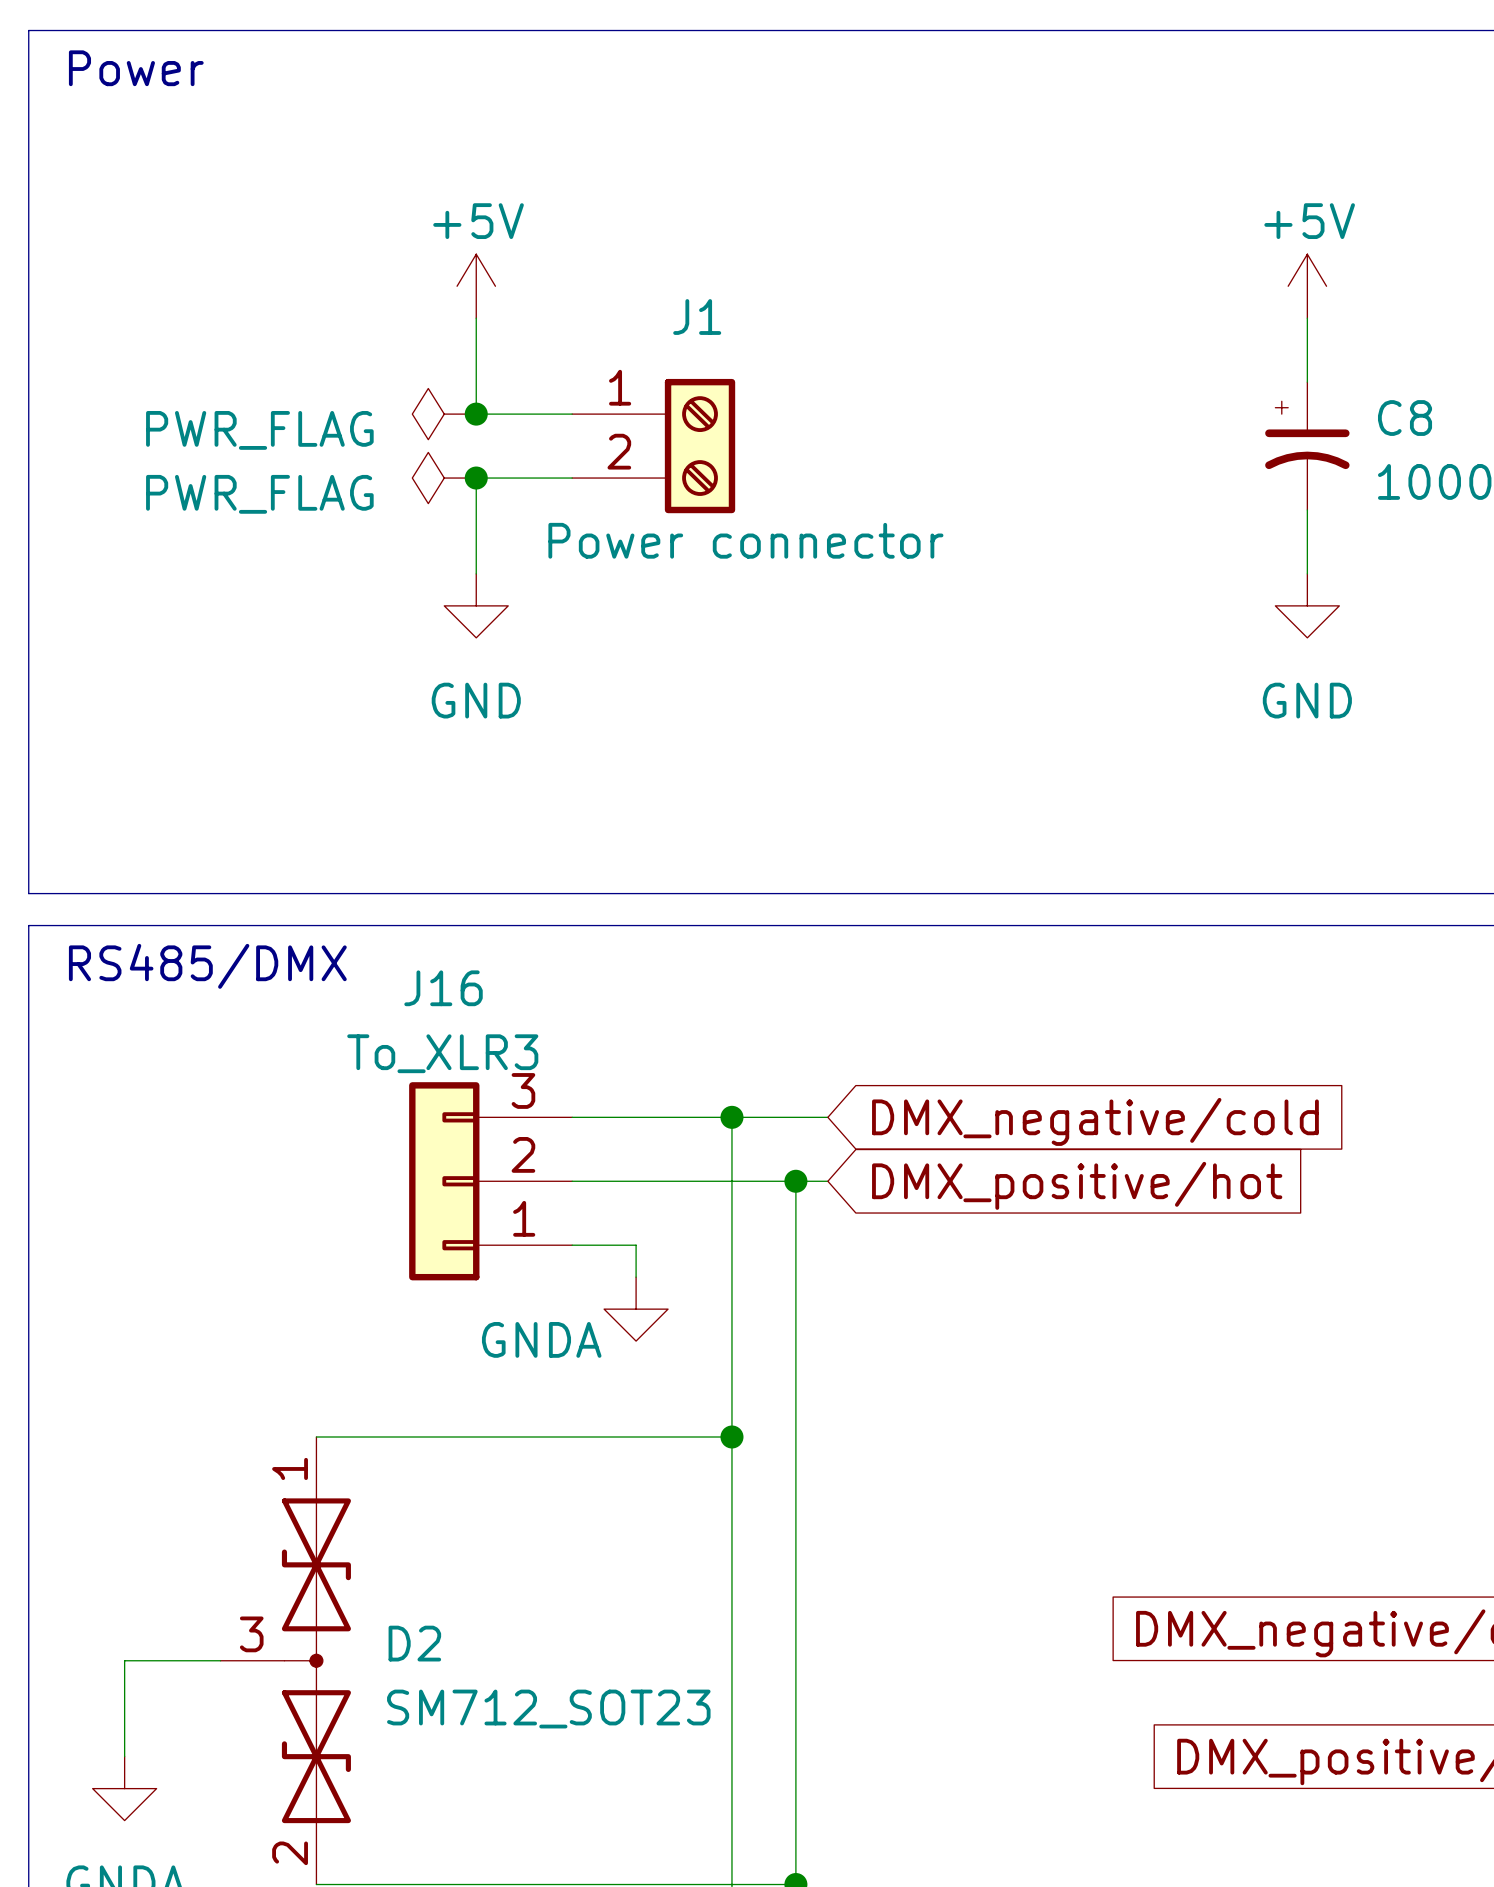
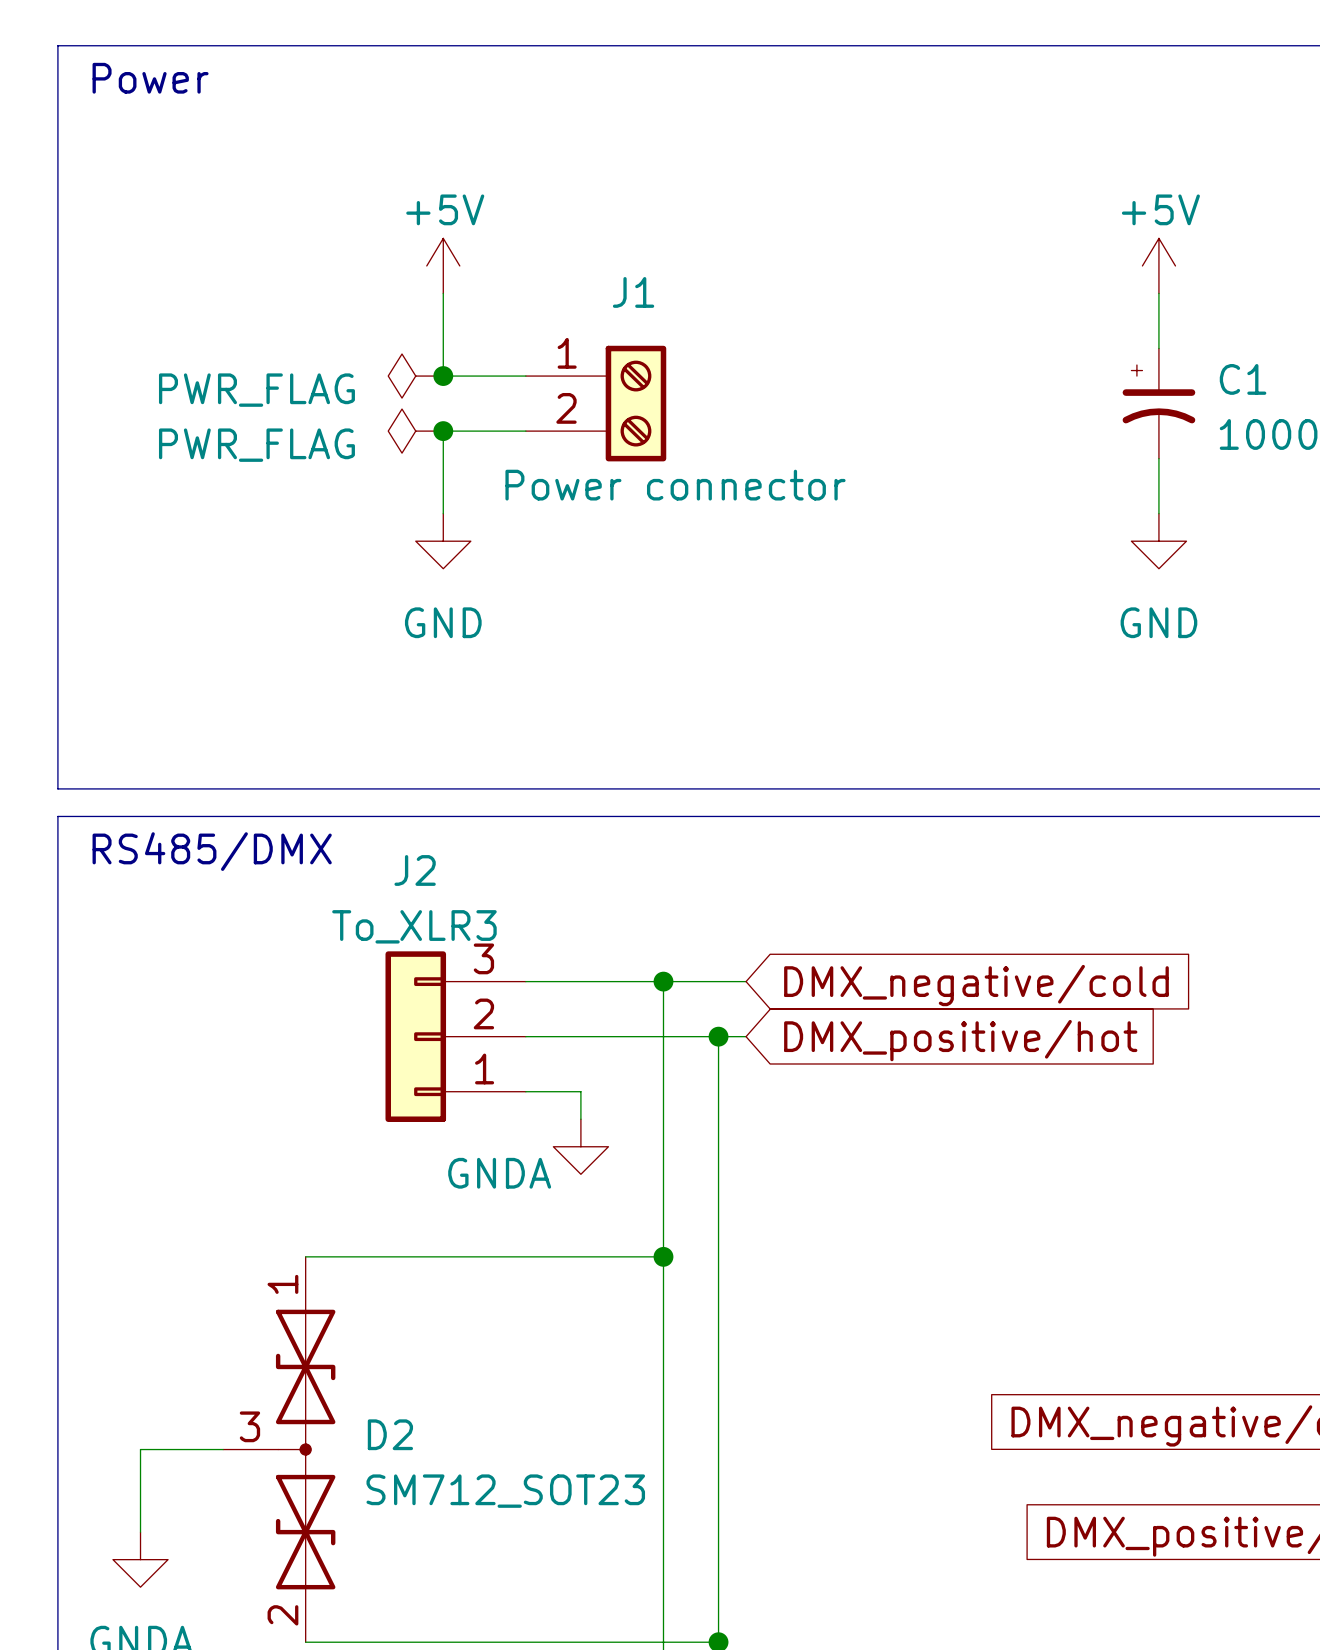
C8 name: C8 (1405, 418) -> C1 (1243, 379)
J16 name: J16 (443, 988) -> J2 (415, 870)

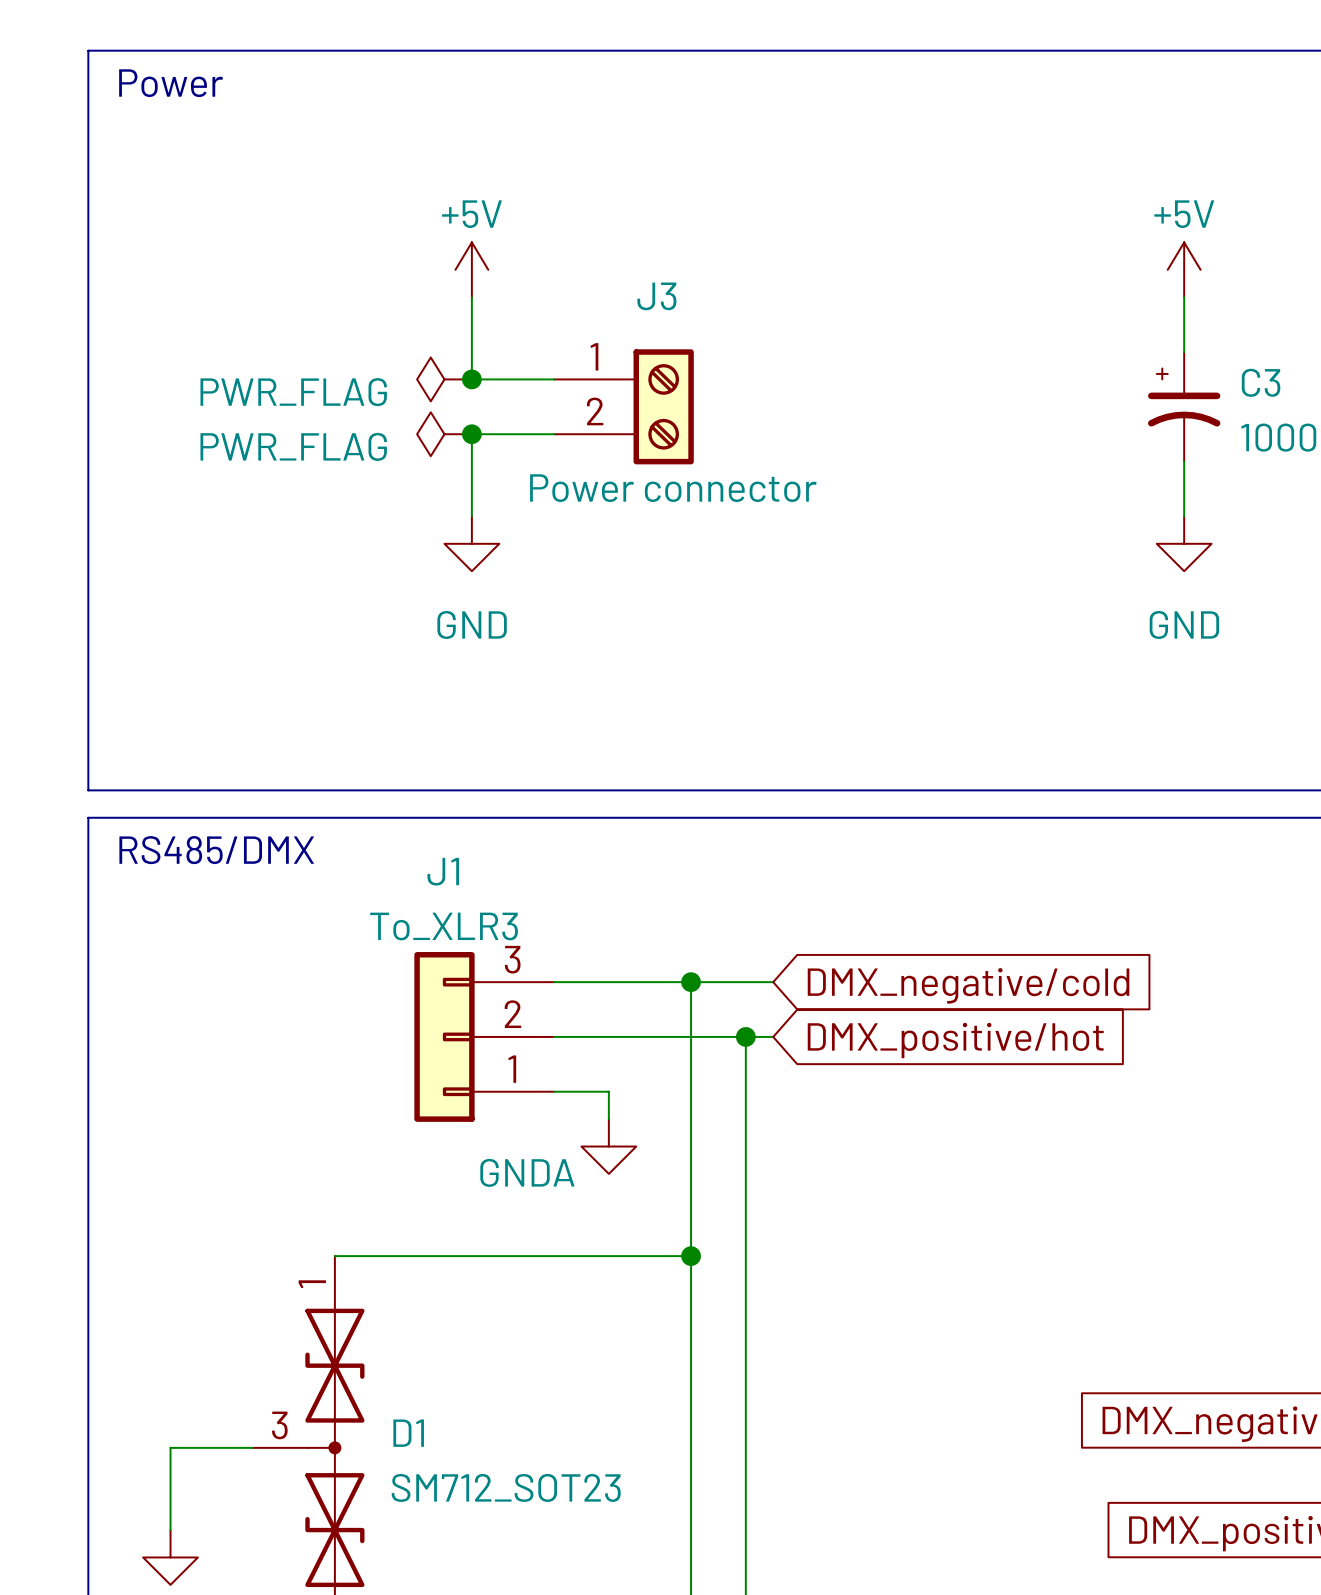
J1 name: J1 (633, 292) -> J3 (656, 296)
C1 name: C1 (1243, 379) -> C3 (1261, 382)
J2 name: J2 (415, 870) -> J1 (443, 871)
D2 name: D2 (390, 1434) -> D1 (408, 1433)

